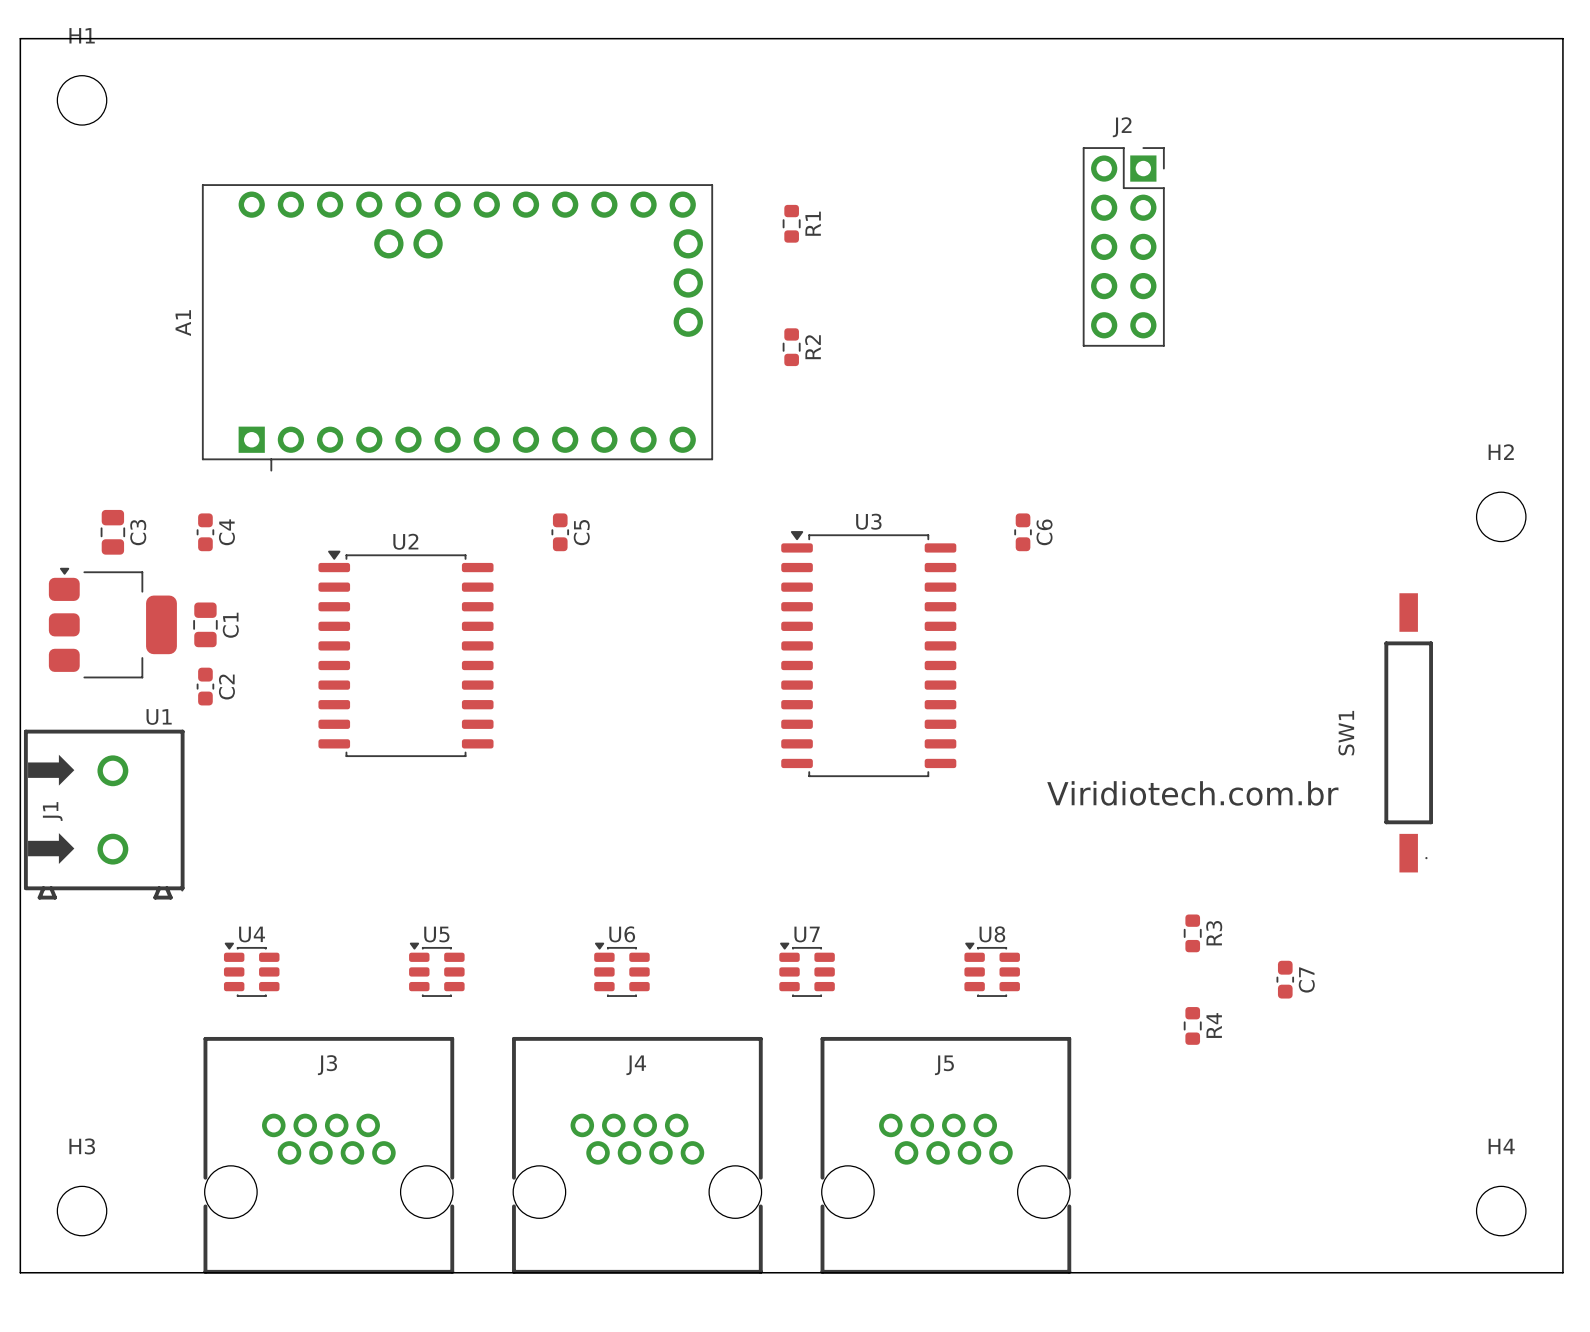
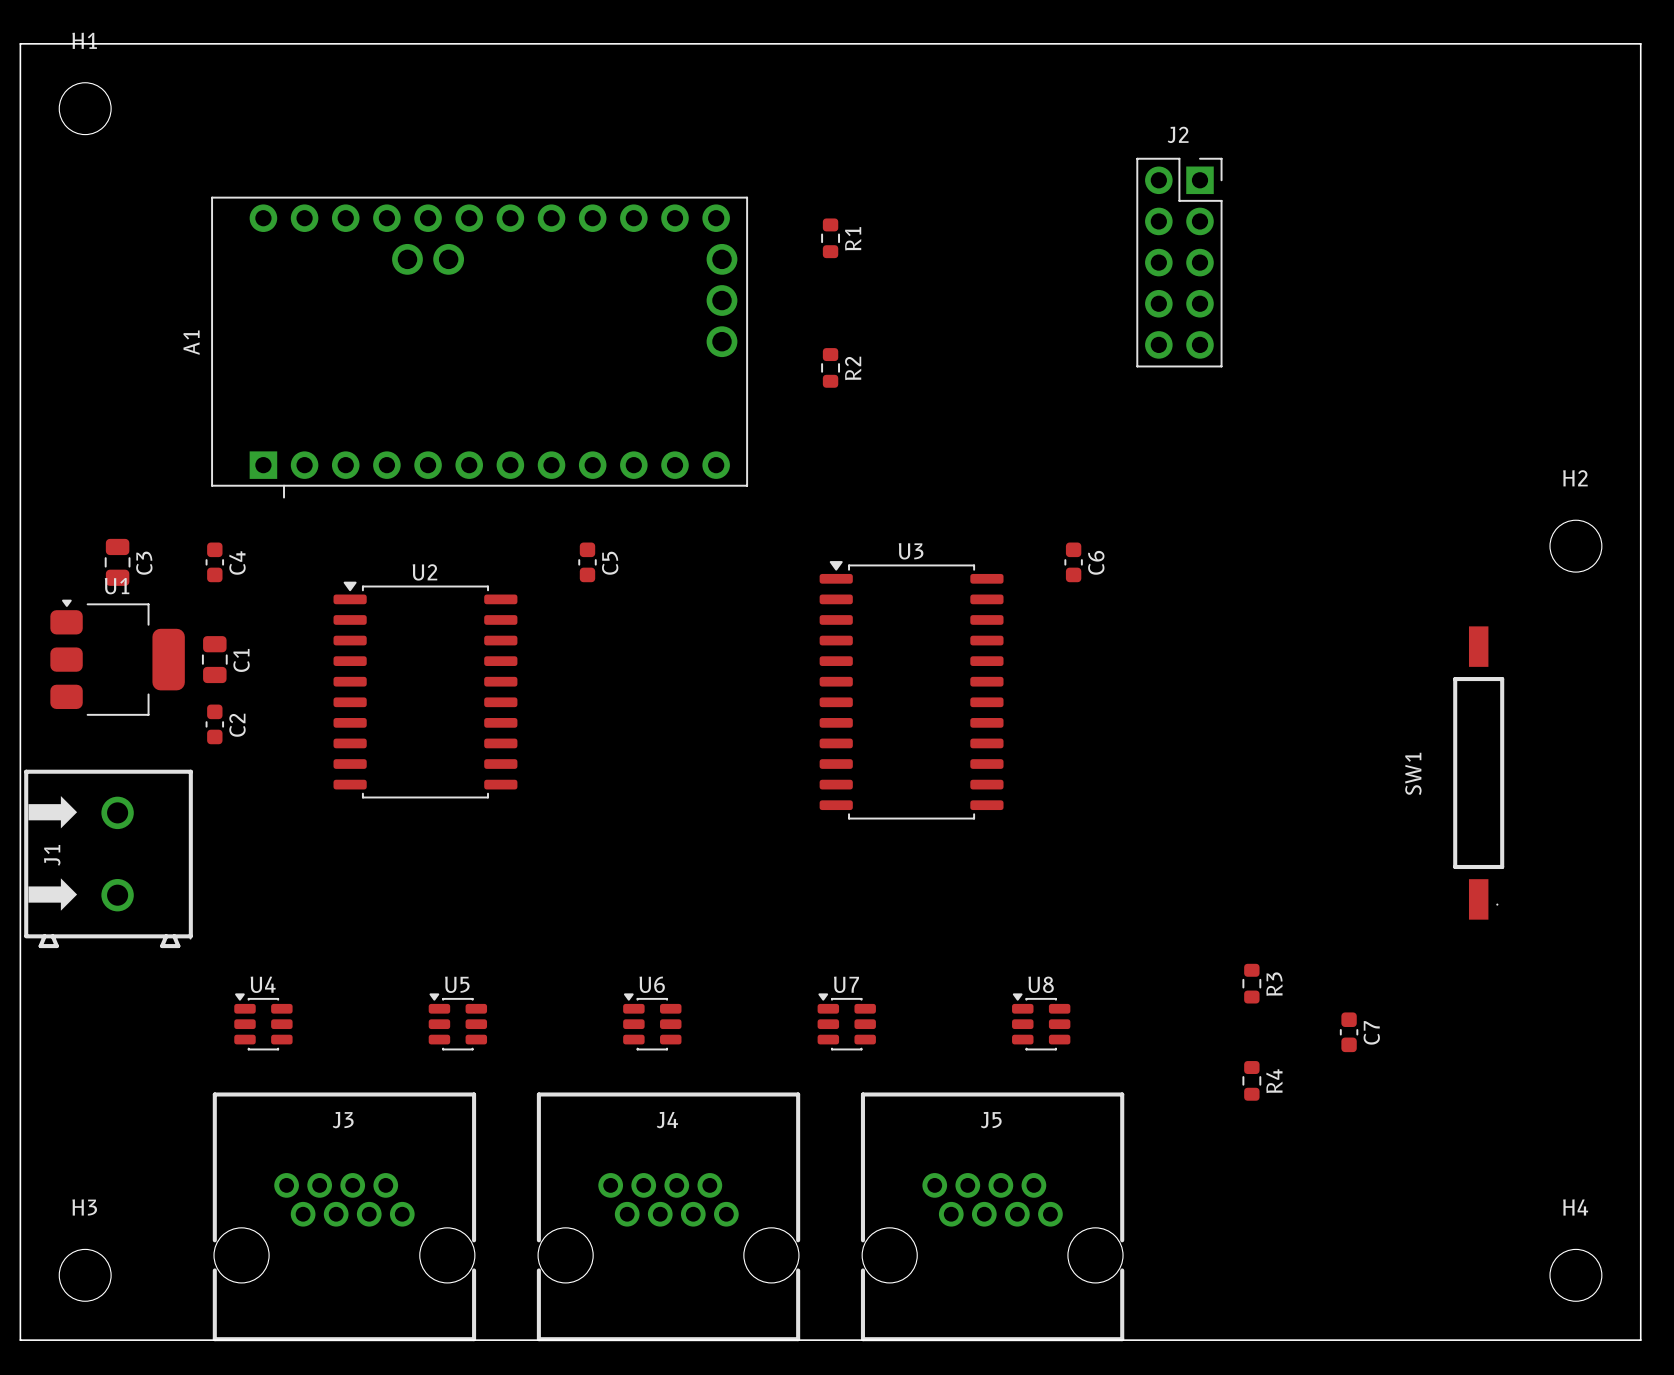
U1 name position: U1 (159, 716) -> U1 (117, 586)
text: Viridiotech.com.br (1192, 793) -> none

